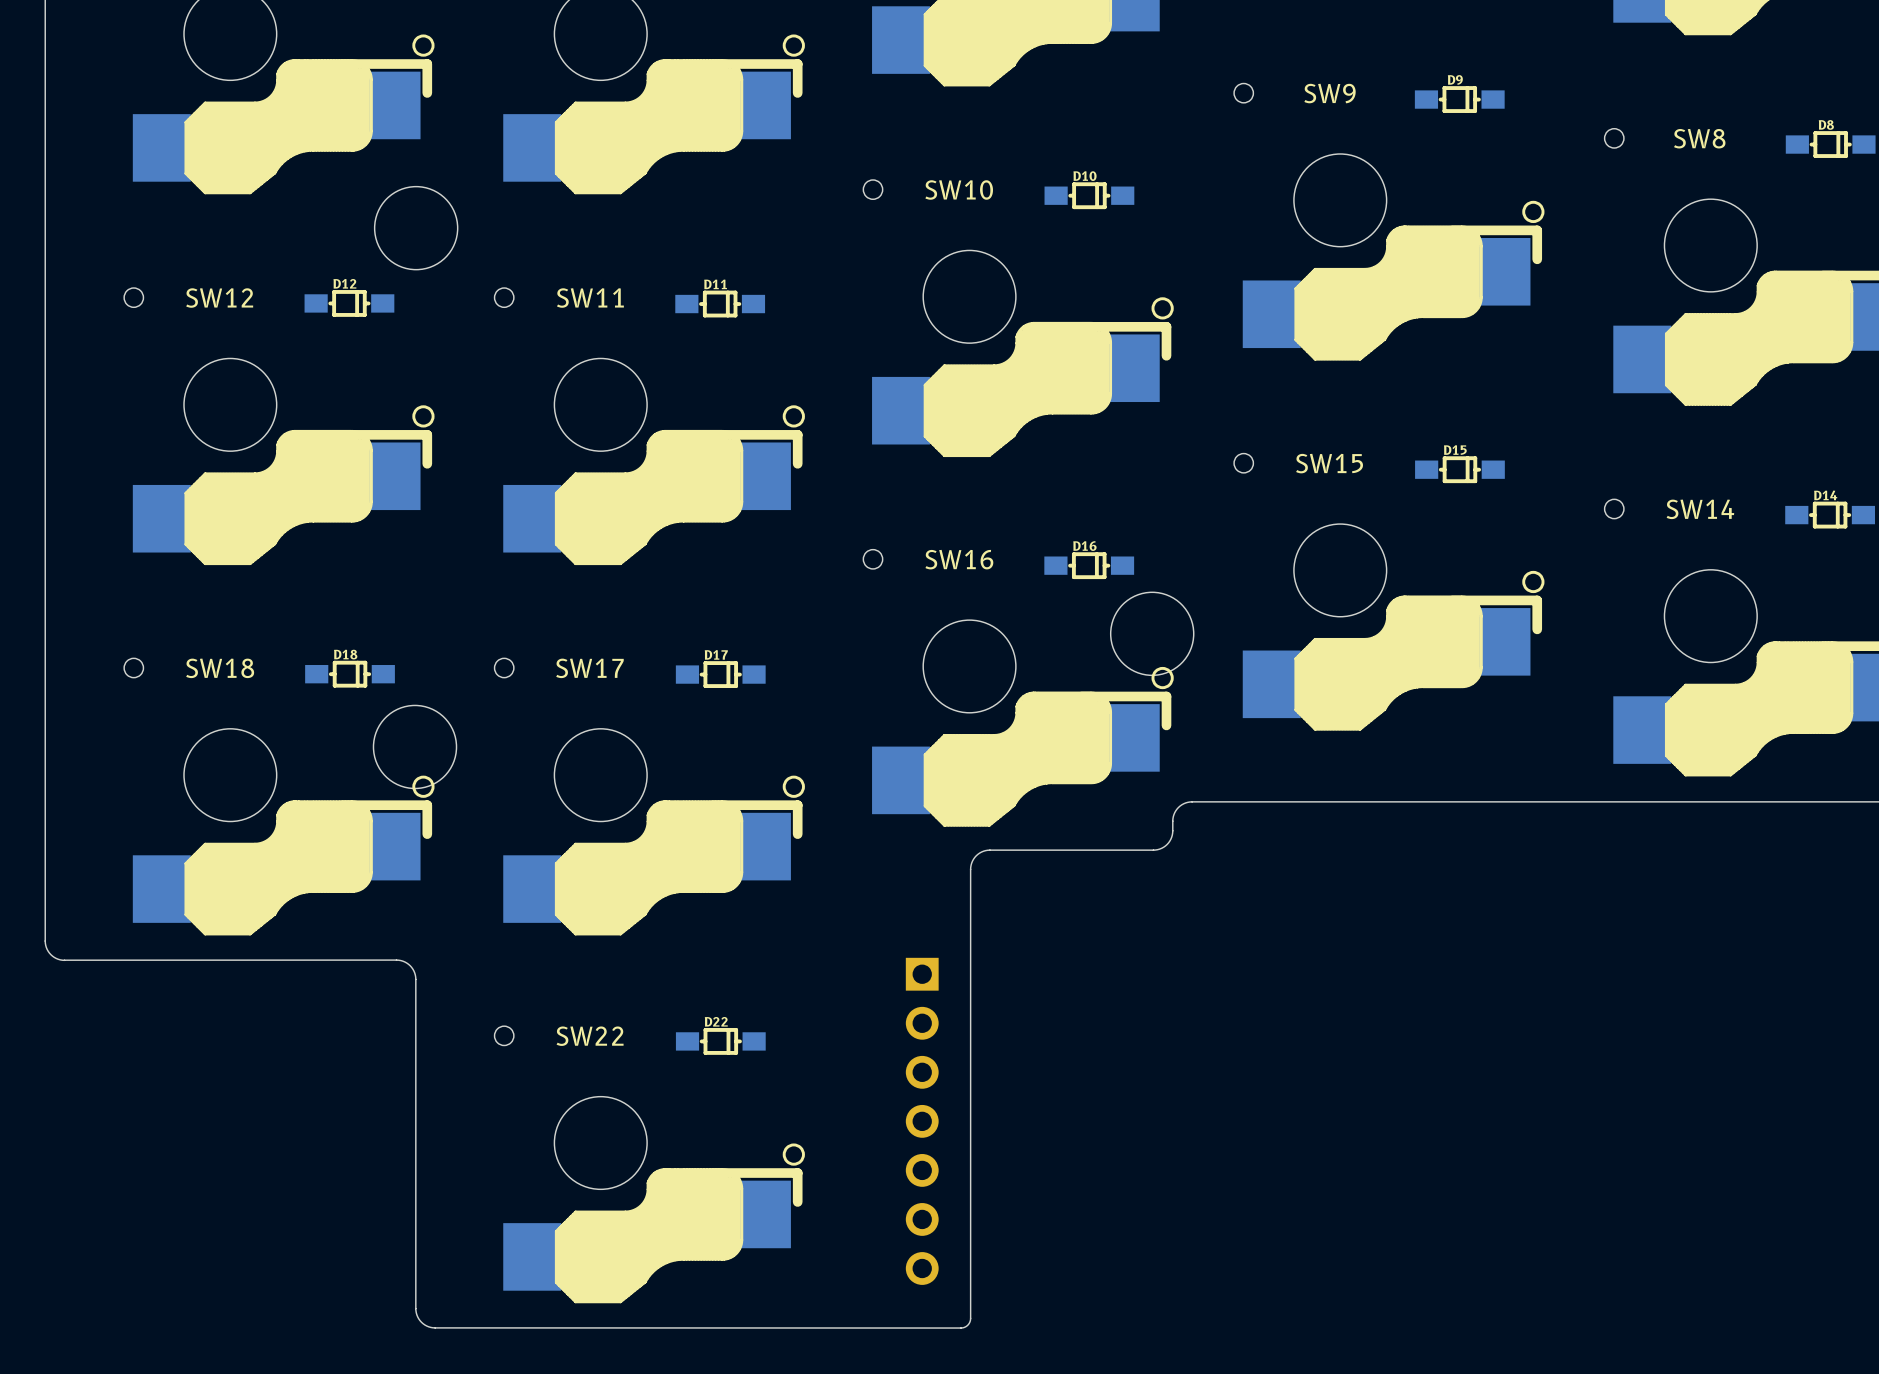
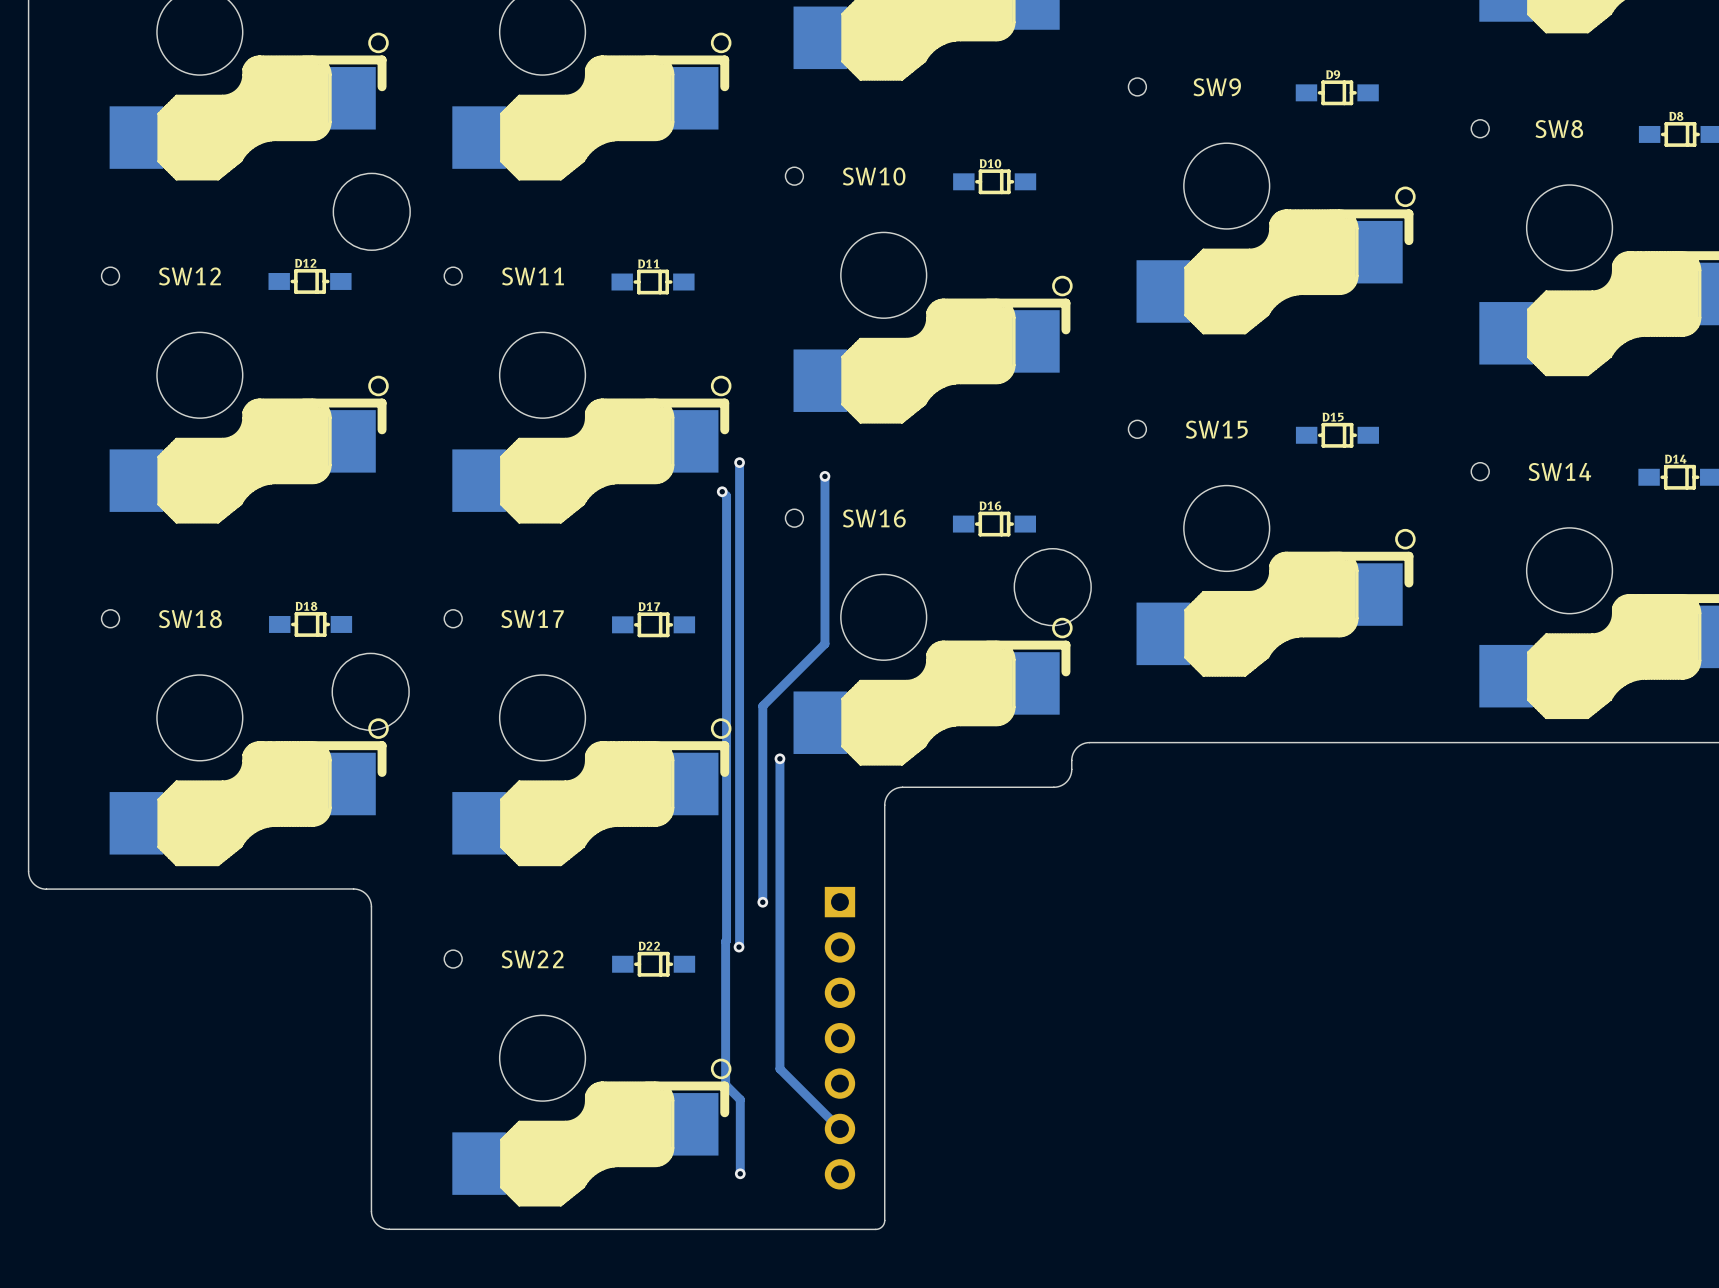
track: none -> (739, 462) (739, 947)
via: none -> (739, 462)
track: none -> (824, 476) (824, 643) (762, 706) (762, 902)
via: none -> (824, 476)
track: none -> (722, 491) (726, 496) (725, 1084) (740, 1099) (740, 1173)
via: none -> (722, 491)
track: none -> (779, 758) (779, 1068) (839, 1128)
via: none -> (779, 758)
via: none -> (762, 902)
via: none -> (739, 947)
via: none -> (740, 1173)

